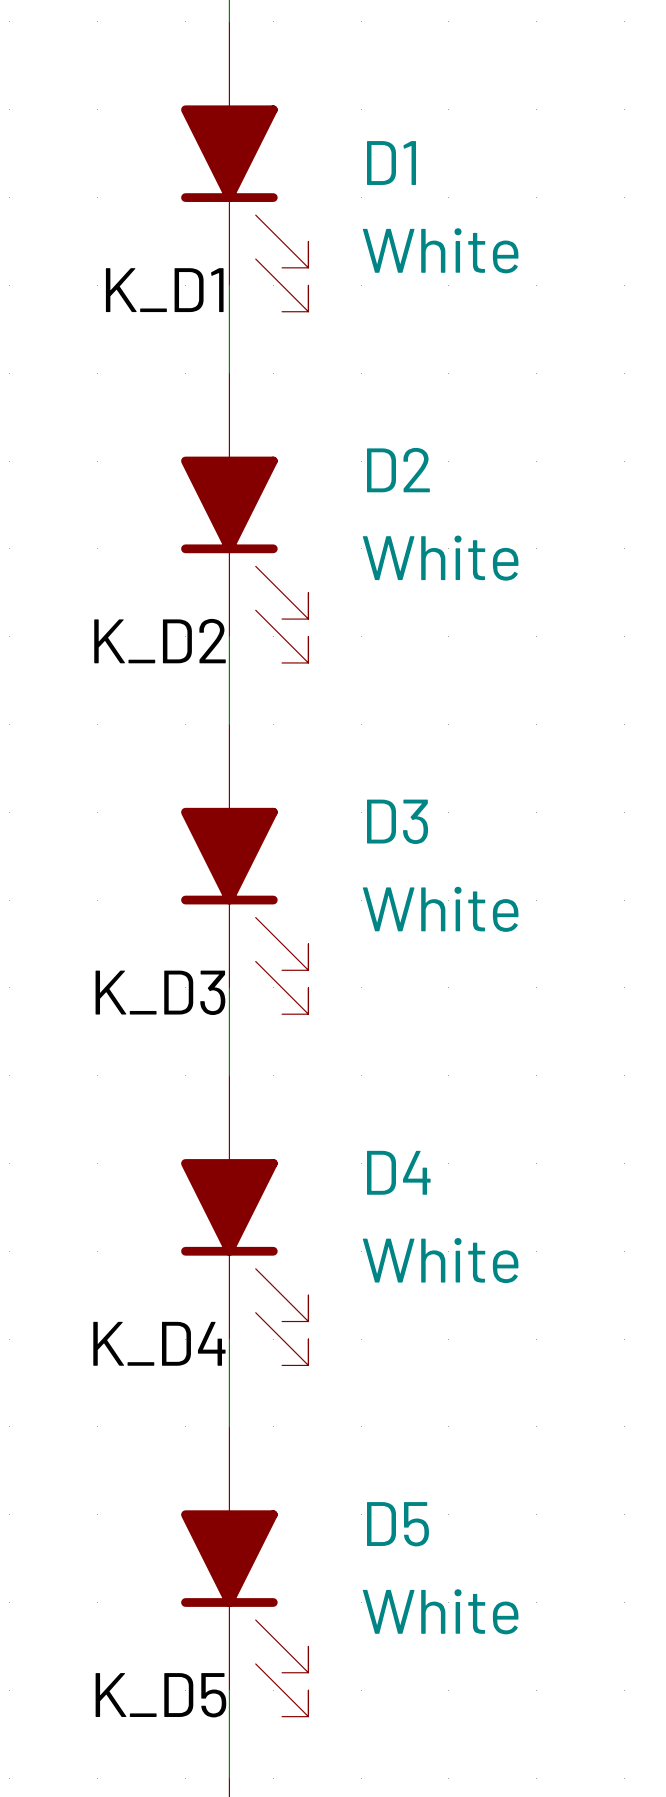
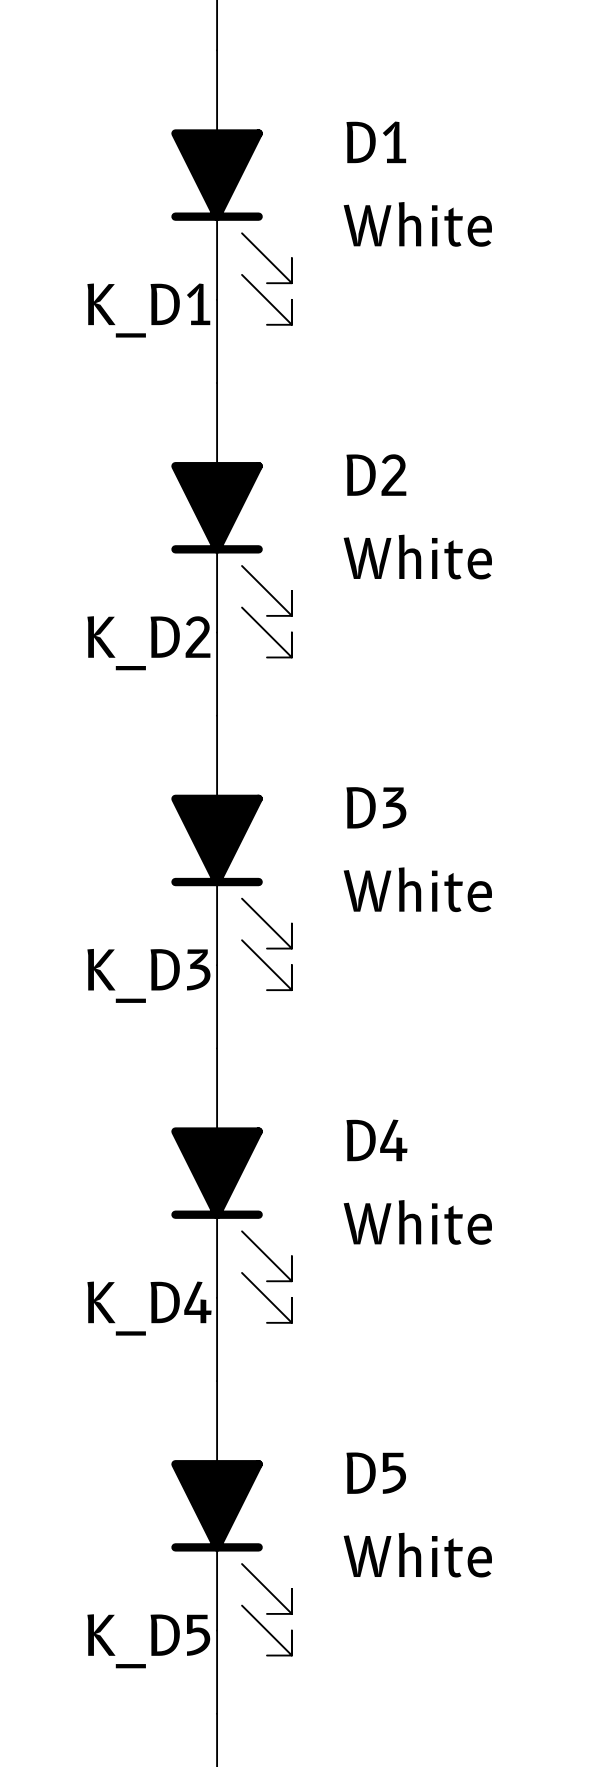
D1 name position: D1 (391, 163) -> D1 (376, 142)
D1 value position: White (440, 250) -> White (417, 224)

